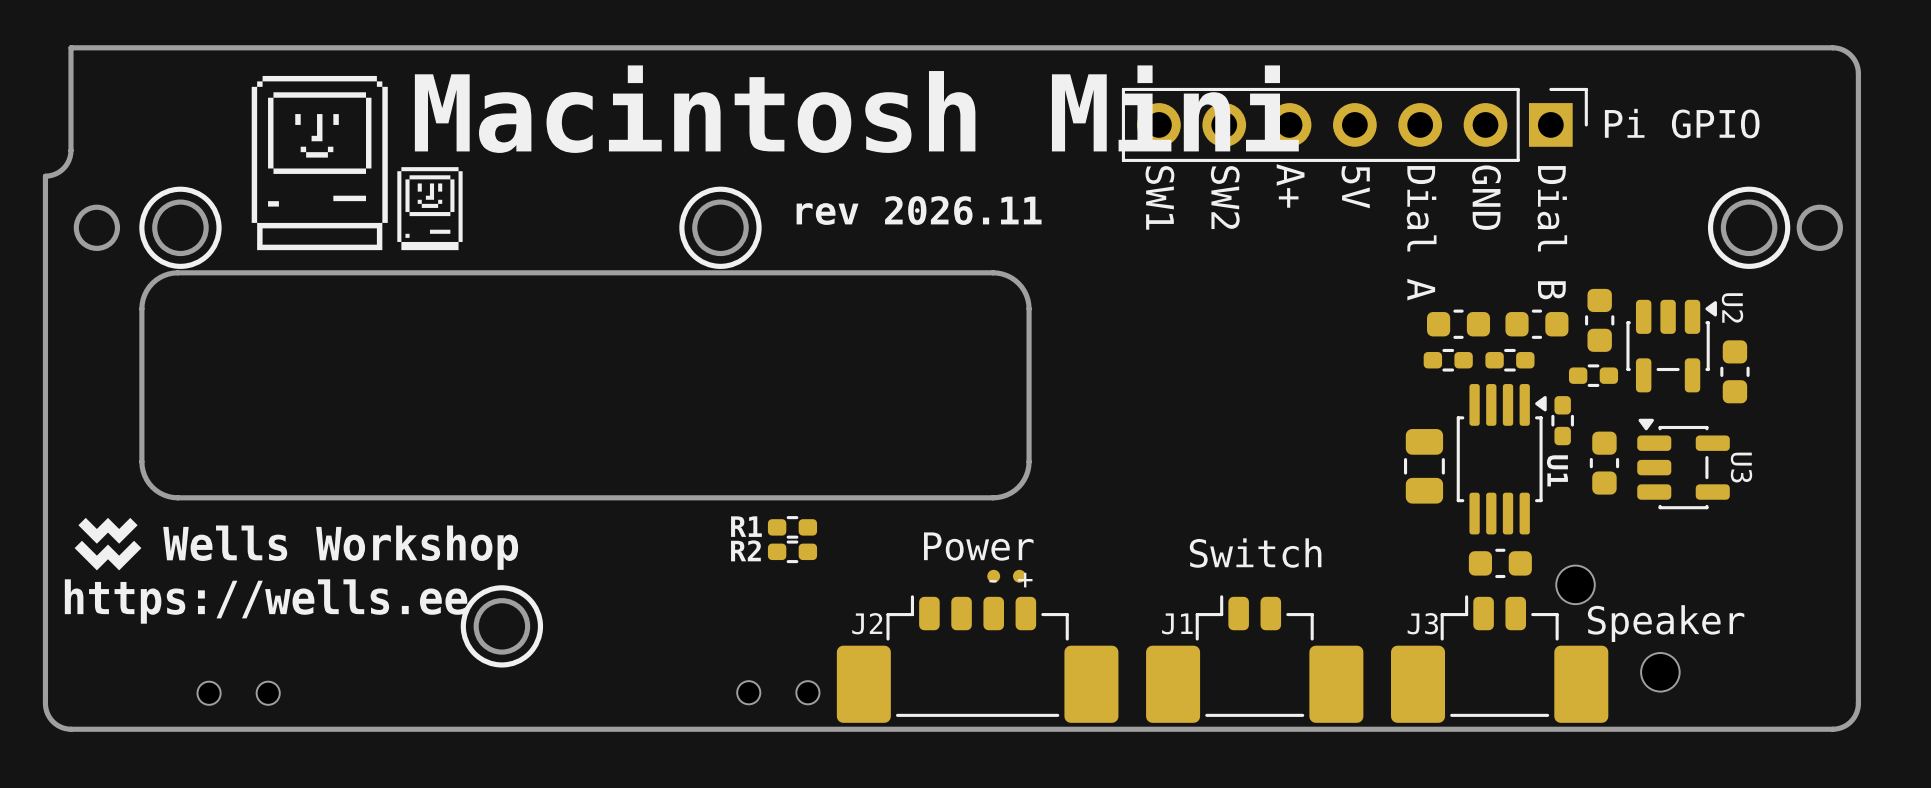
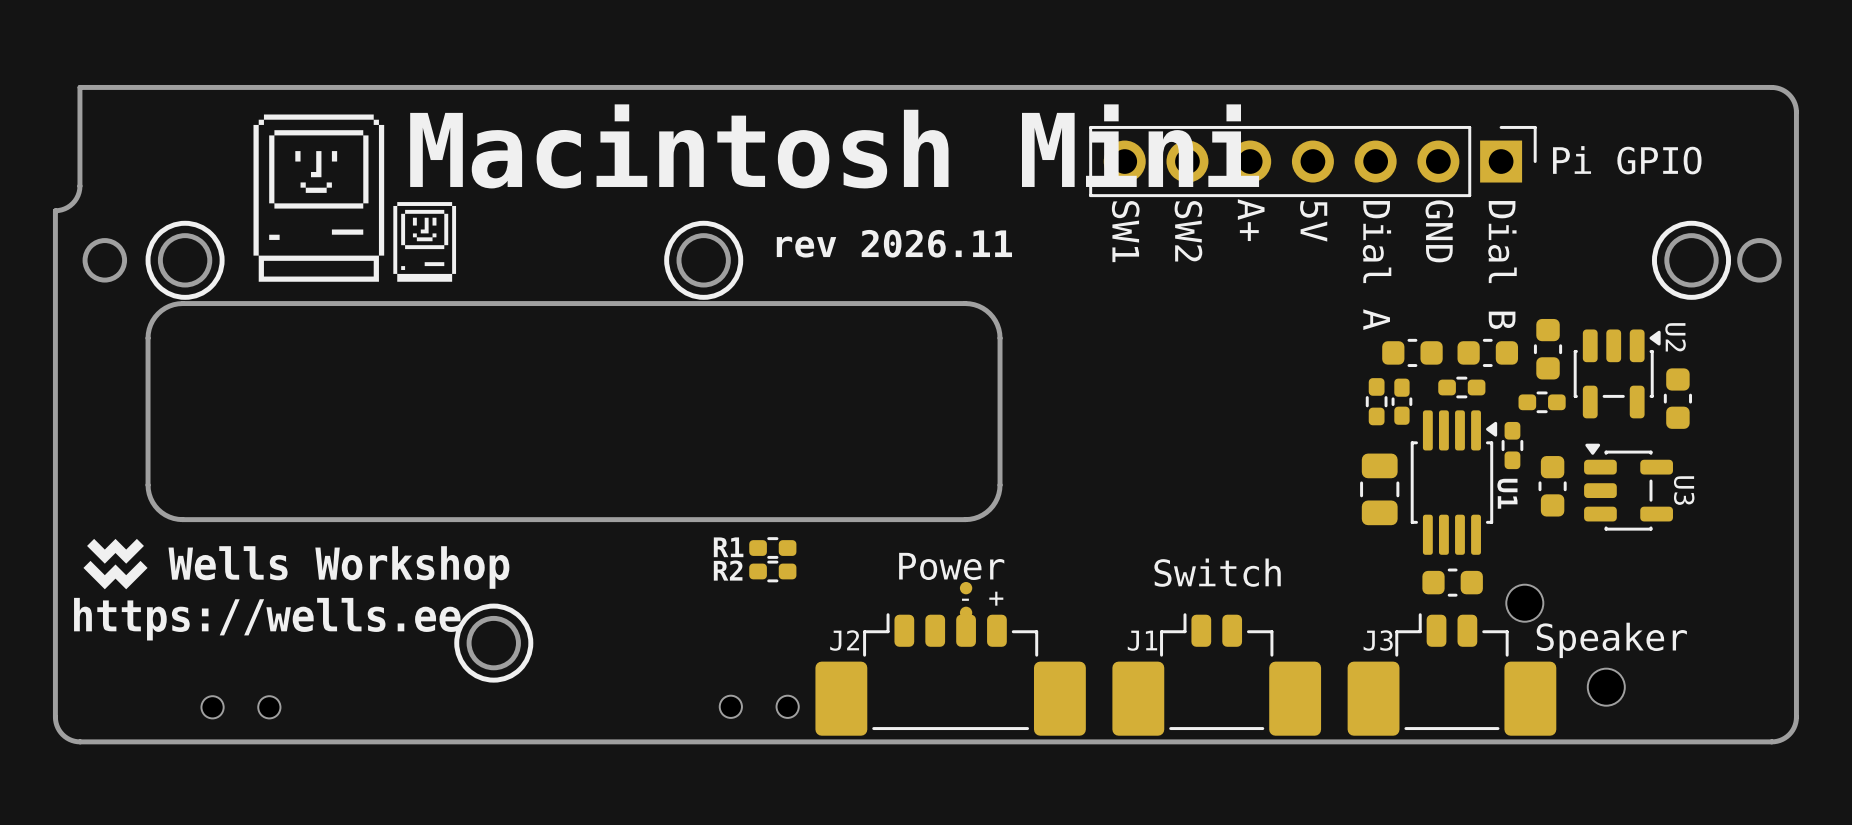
part footprint: [1423, 348, 1473, 372] -> [1391, 378, 1413, 425]
part: none -> (1376, 401)
part rotation: 0° (1006, 576) -> 90° clockwise (966, 600)

